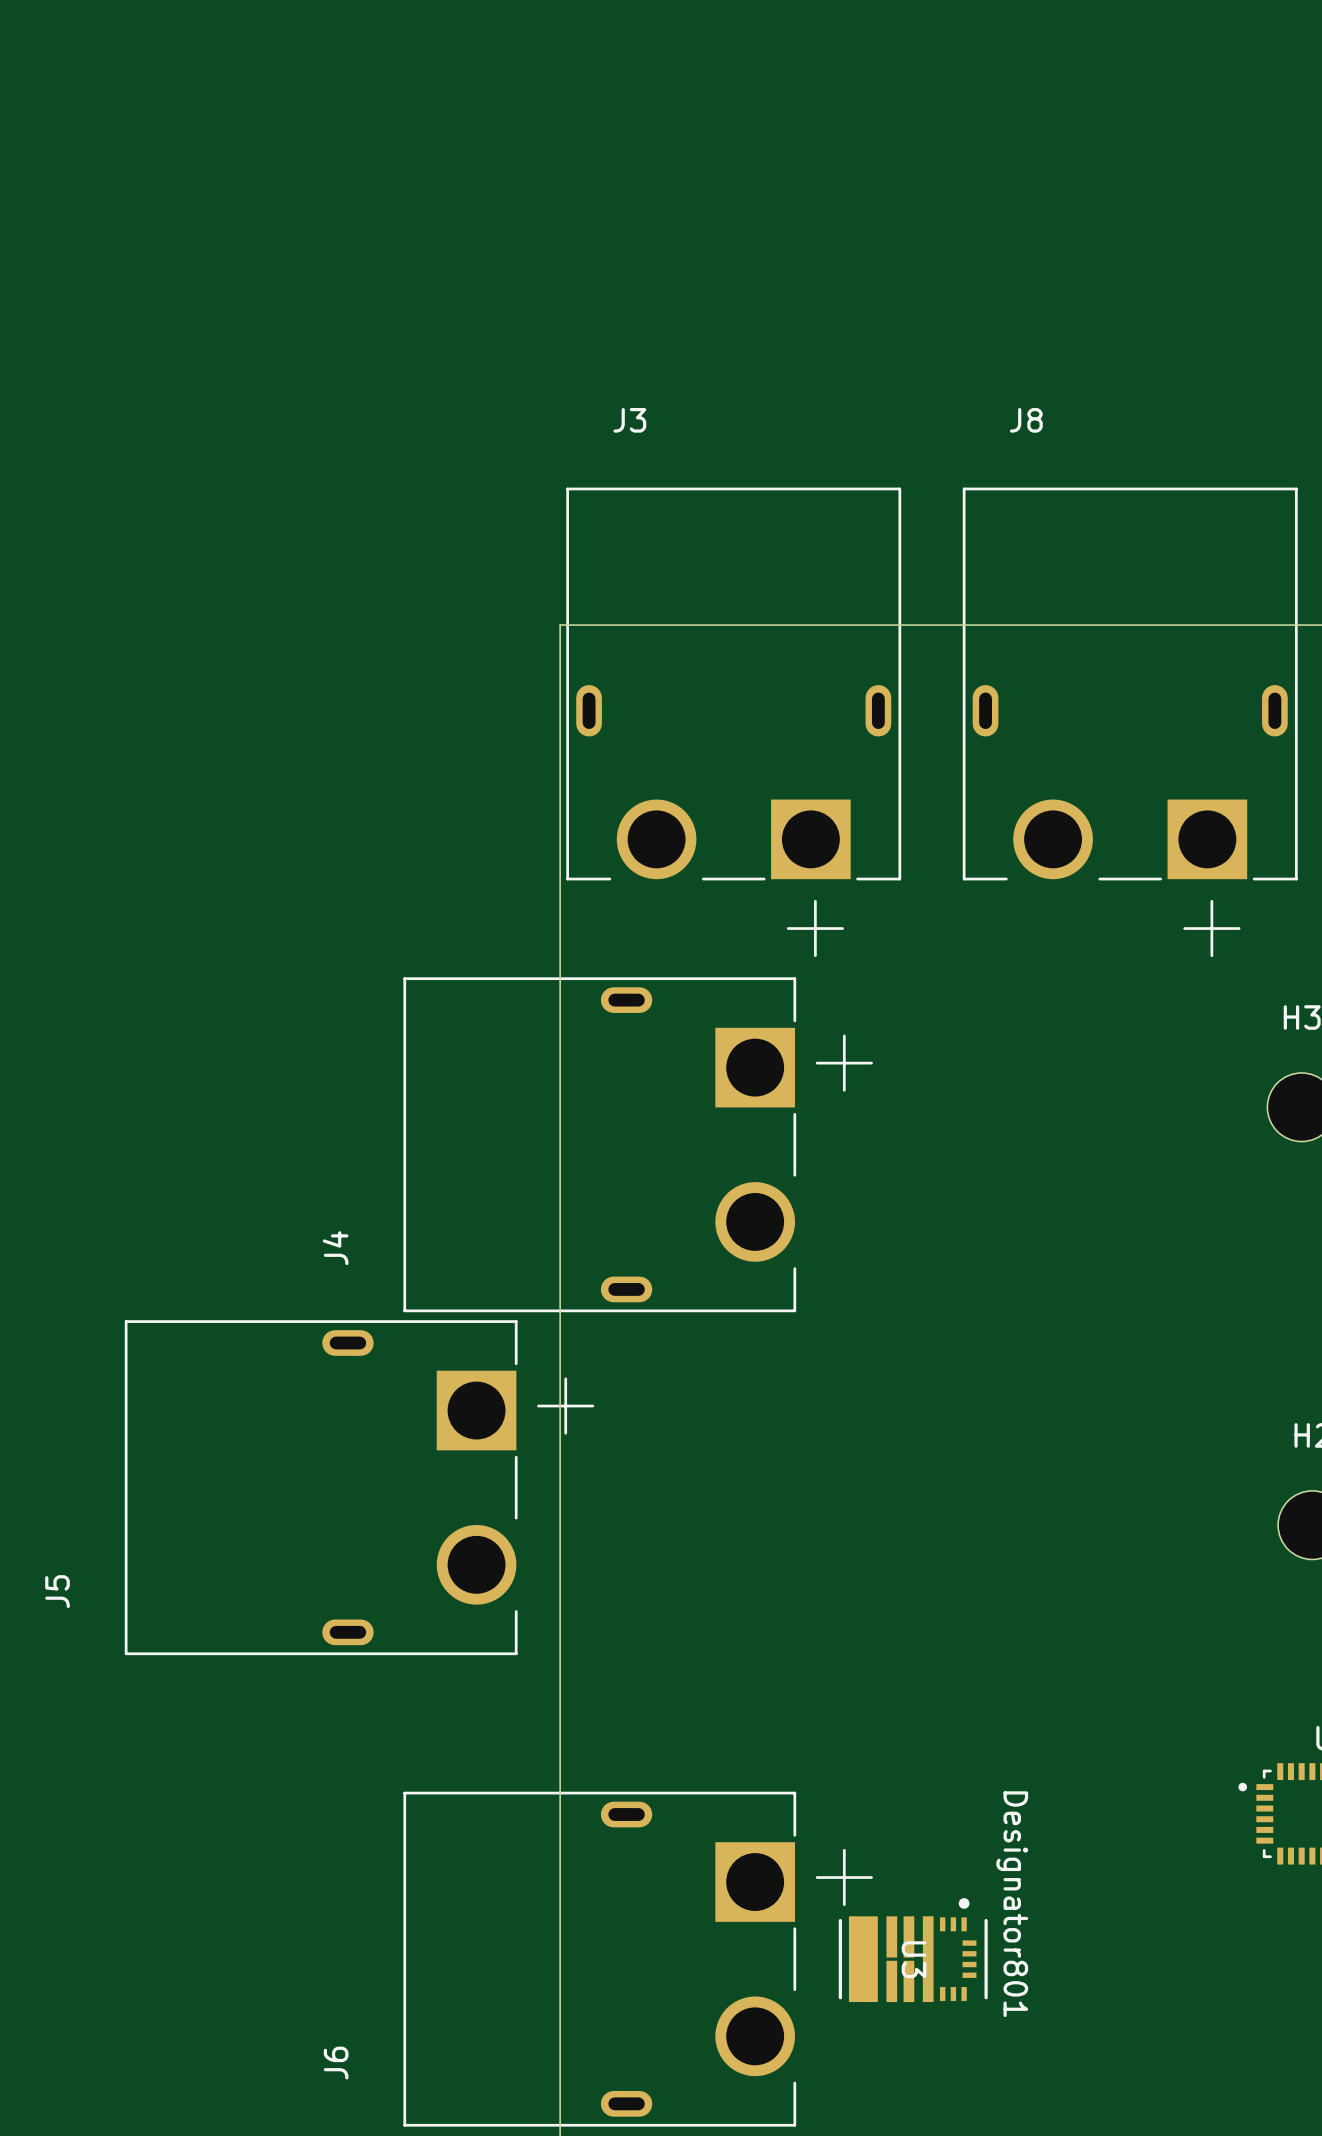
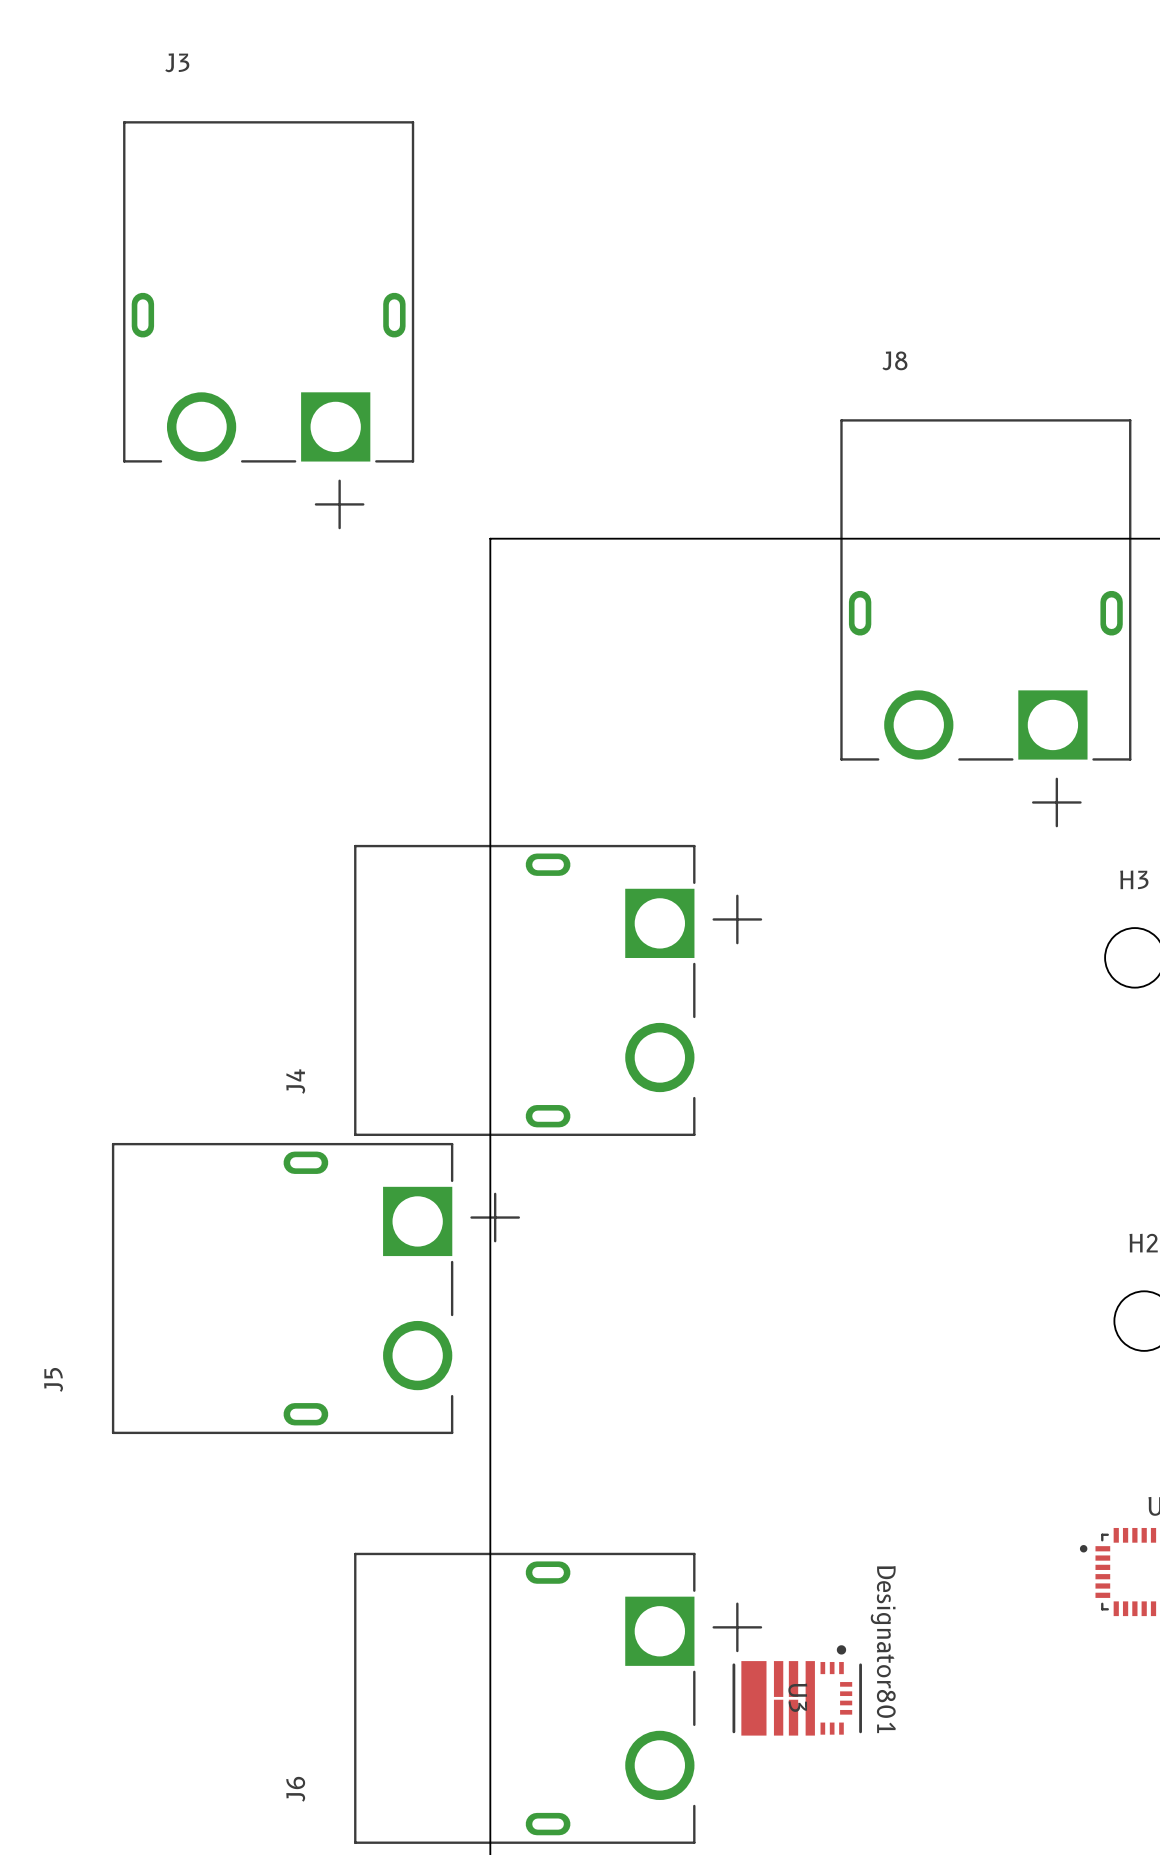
J3 position: (733, 722) -> (268, 325)

